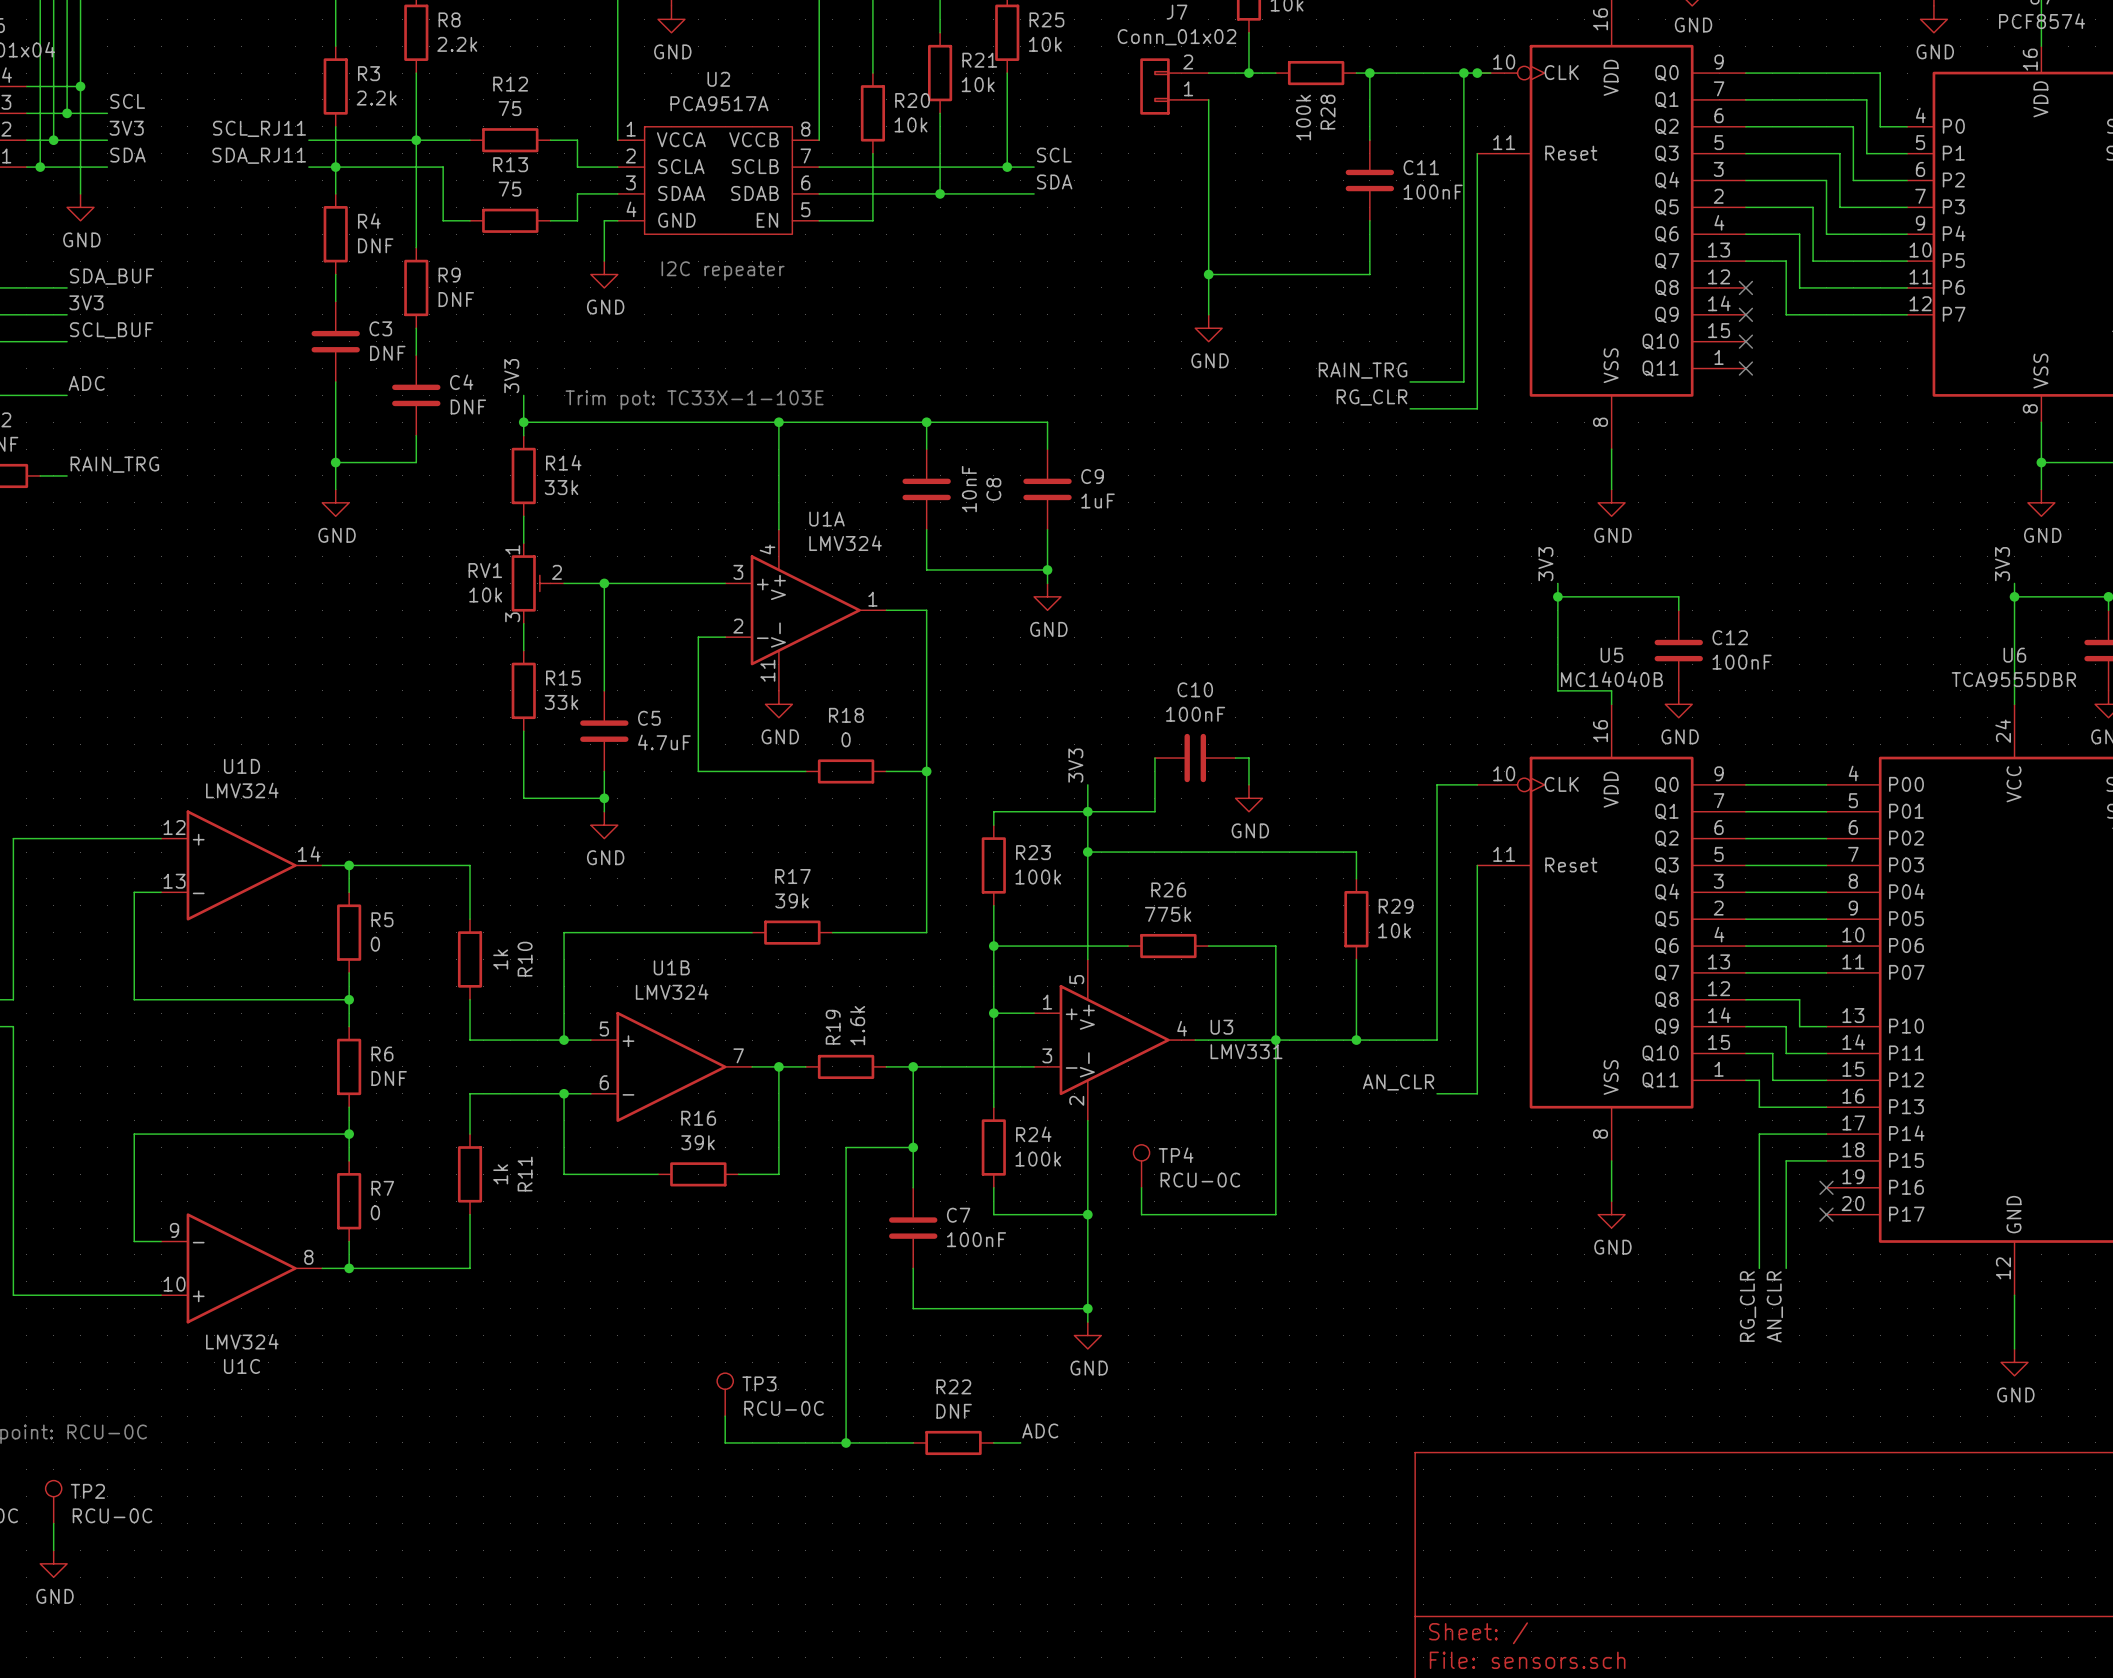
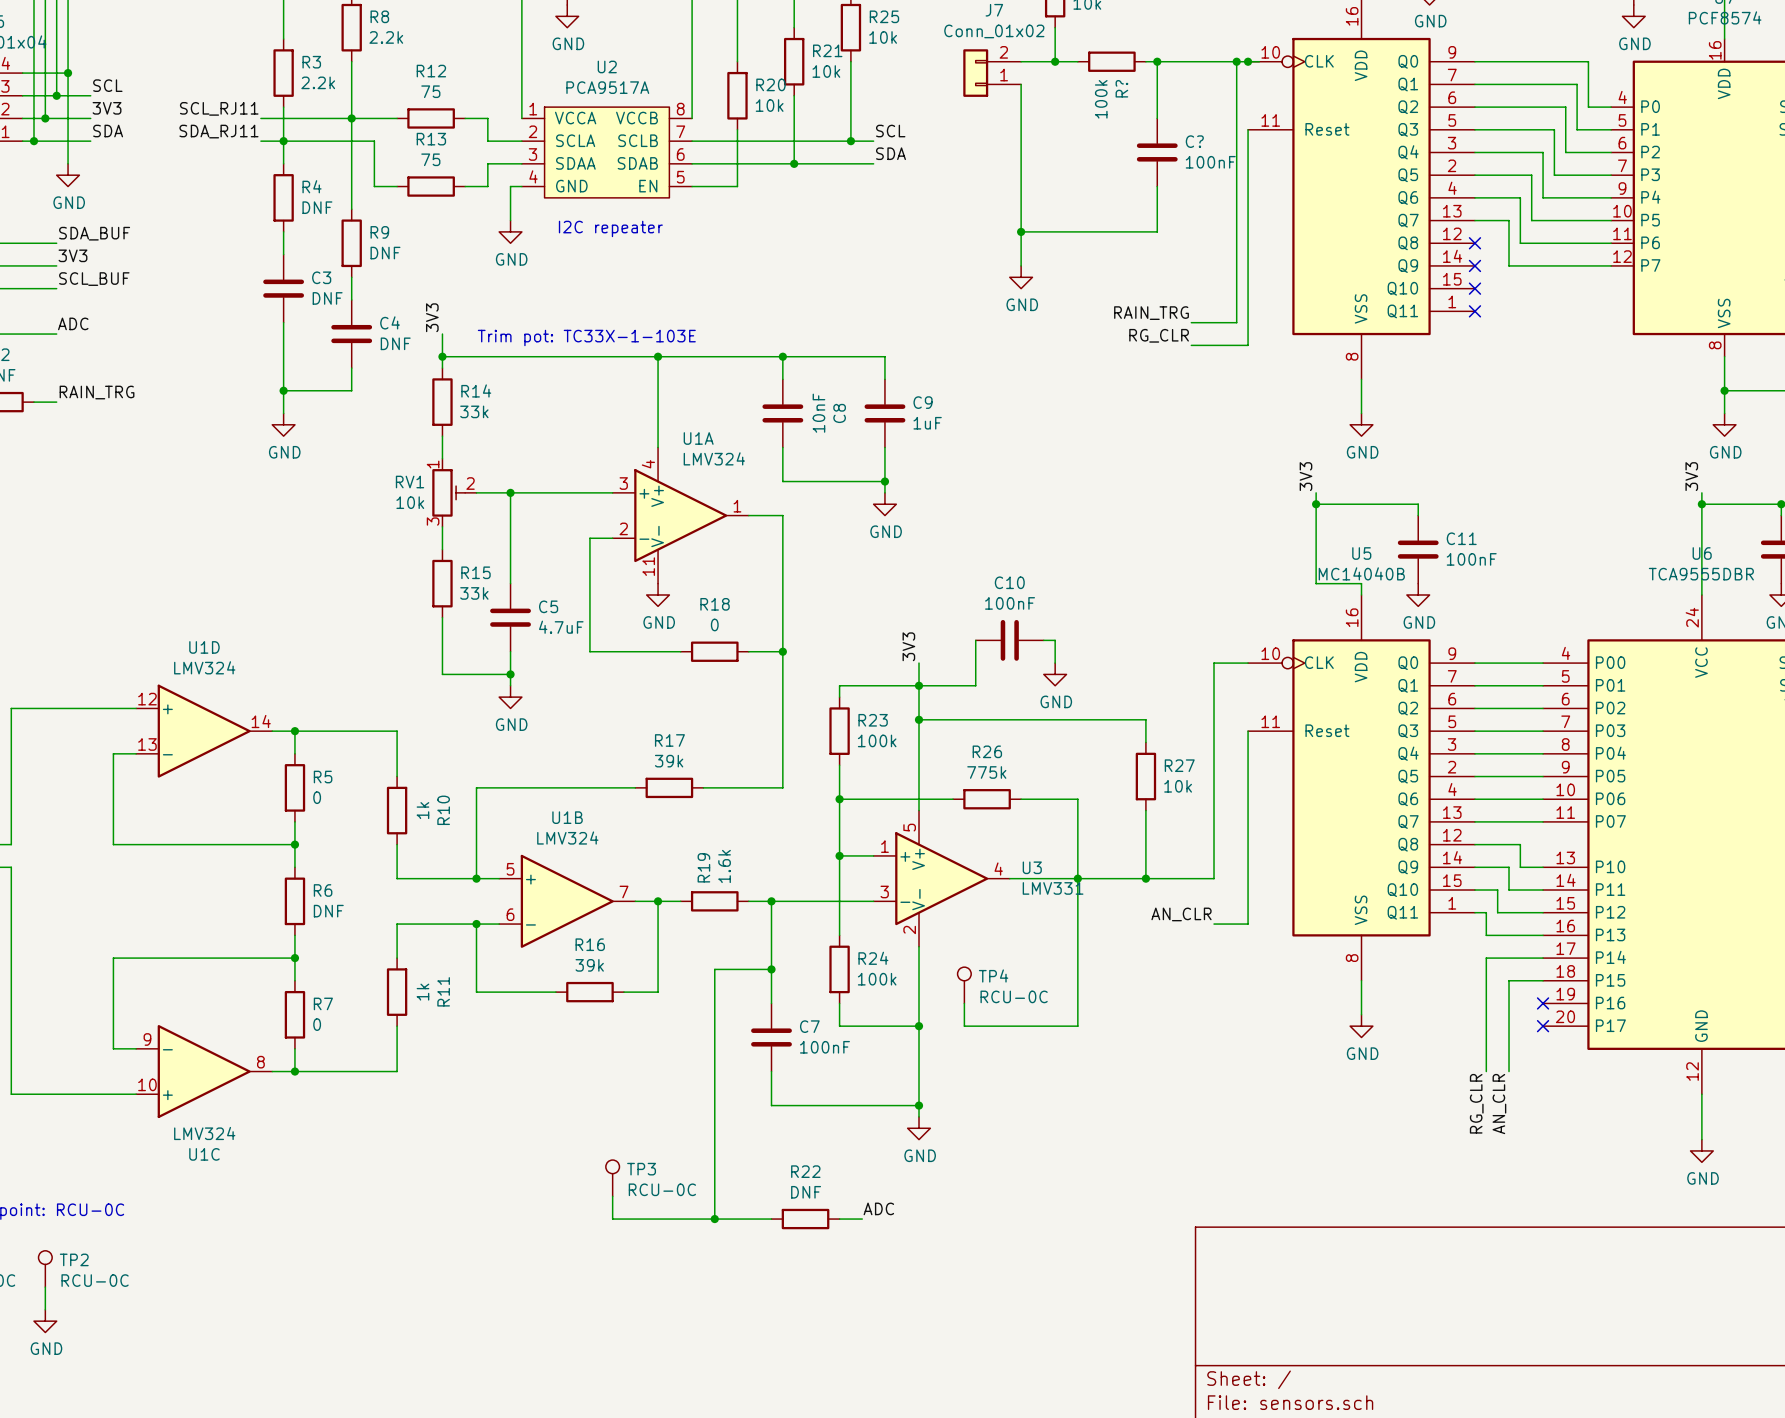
R28 name: R28 (1327, 112) -> R? (1121, 88)
C11 name: C11 (1421, 167) -> C? (1194, 141)
C12 name: C12 (1730, 637) -> C11 (1461, 538)
R29 name: R29 (1396, 906) -> R27 (1179, 765)

